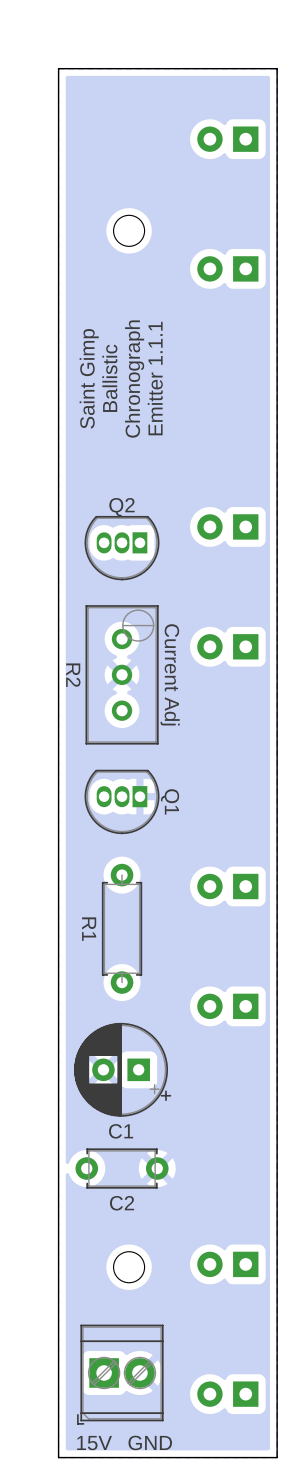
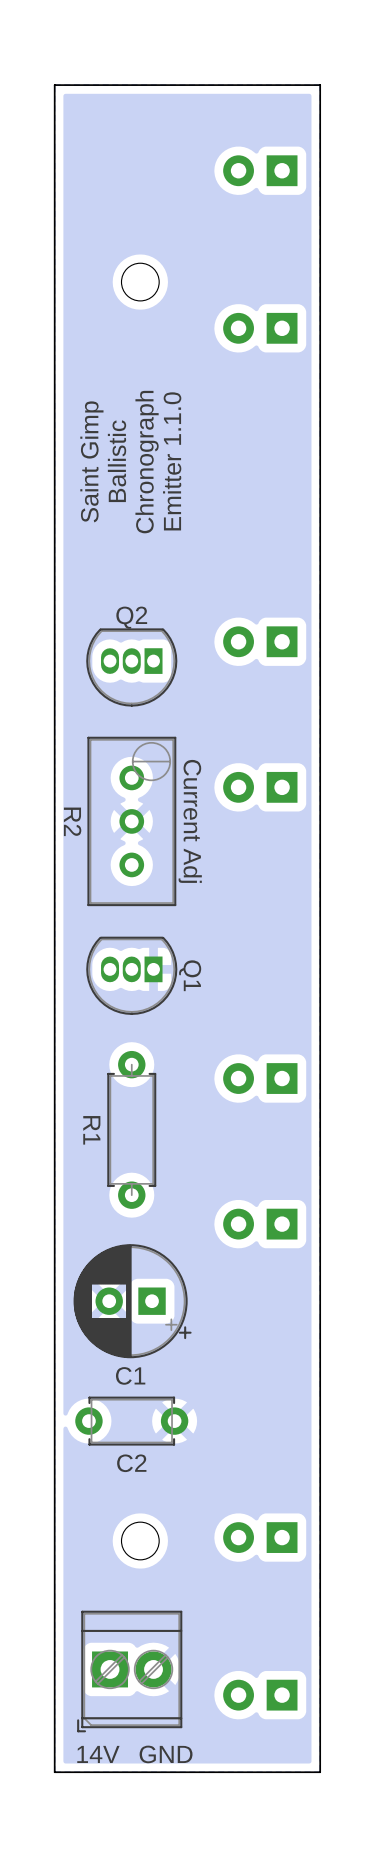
text: Emitter 1.1.1 (155, 378) -> Emitter 1.1.0 (172, 461)
text: 15V (94, 1443) -> 14V (98, 1754)

